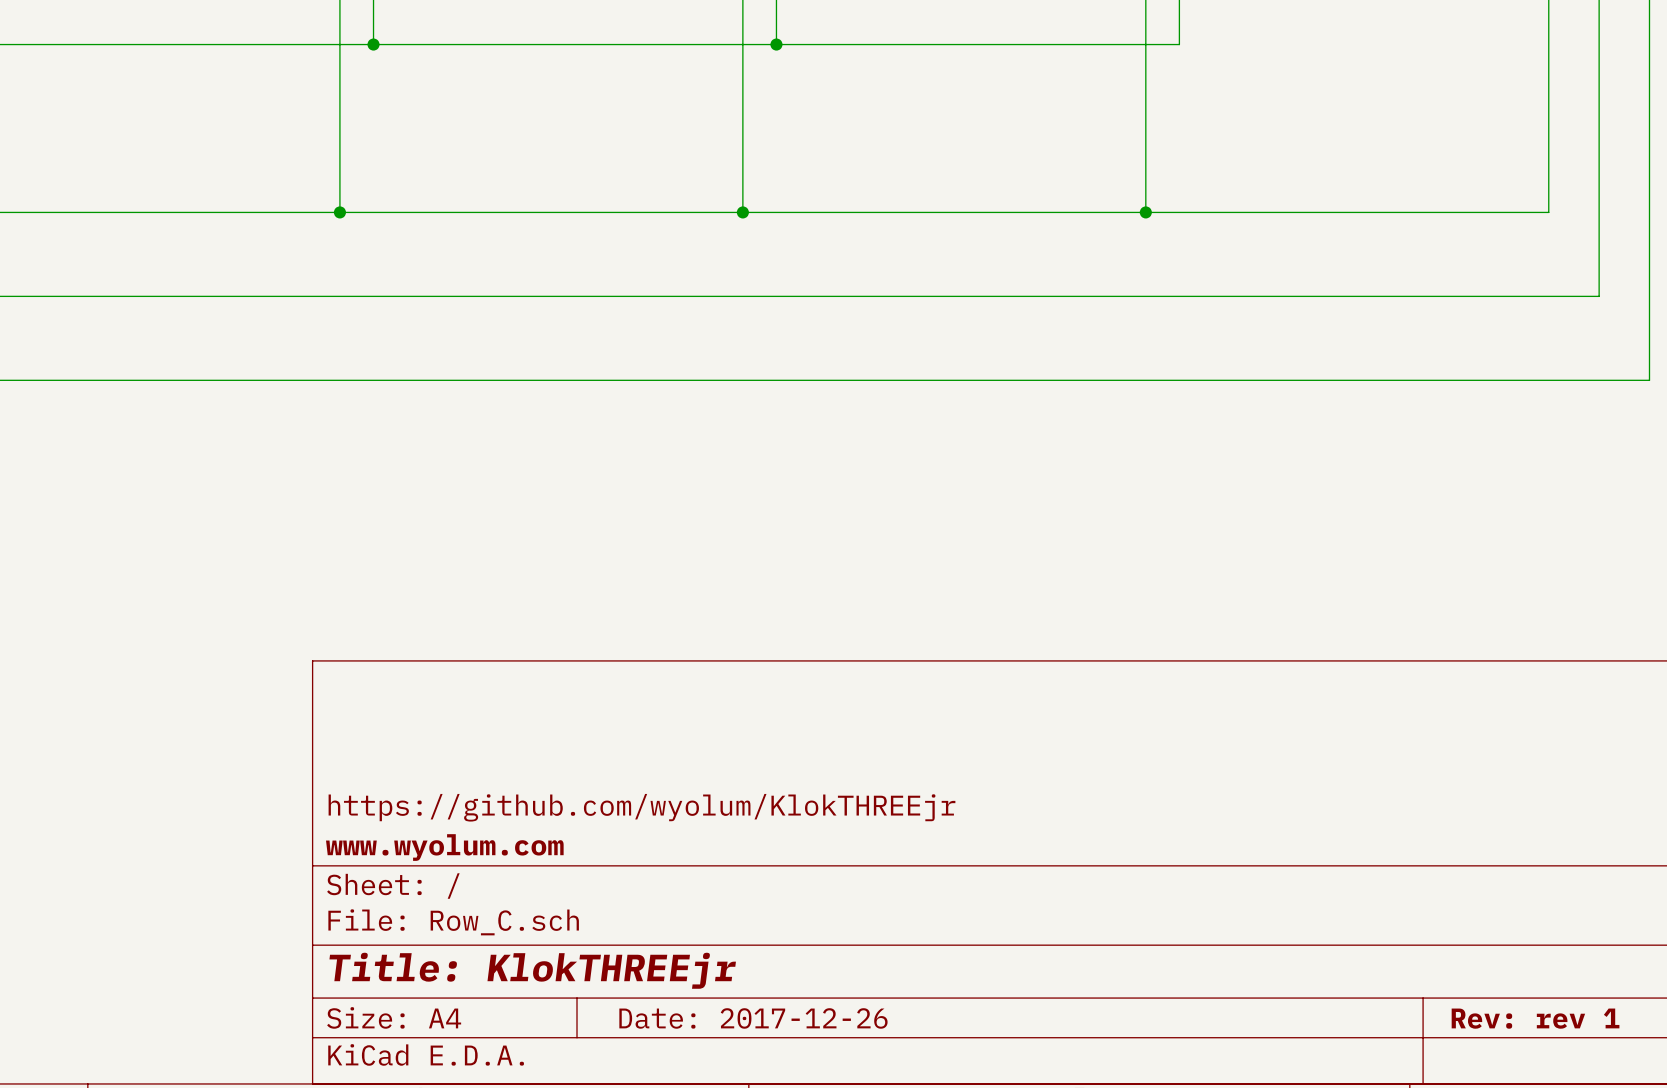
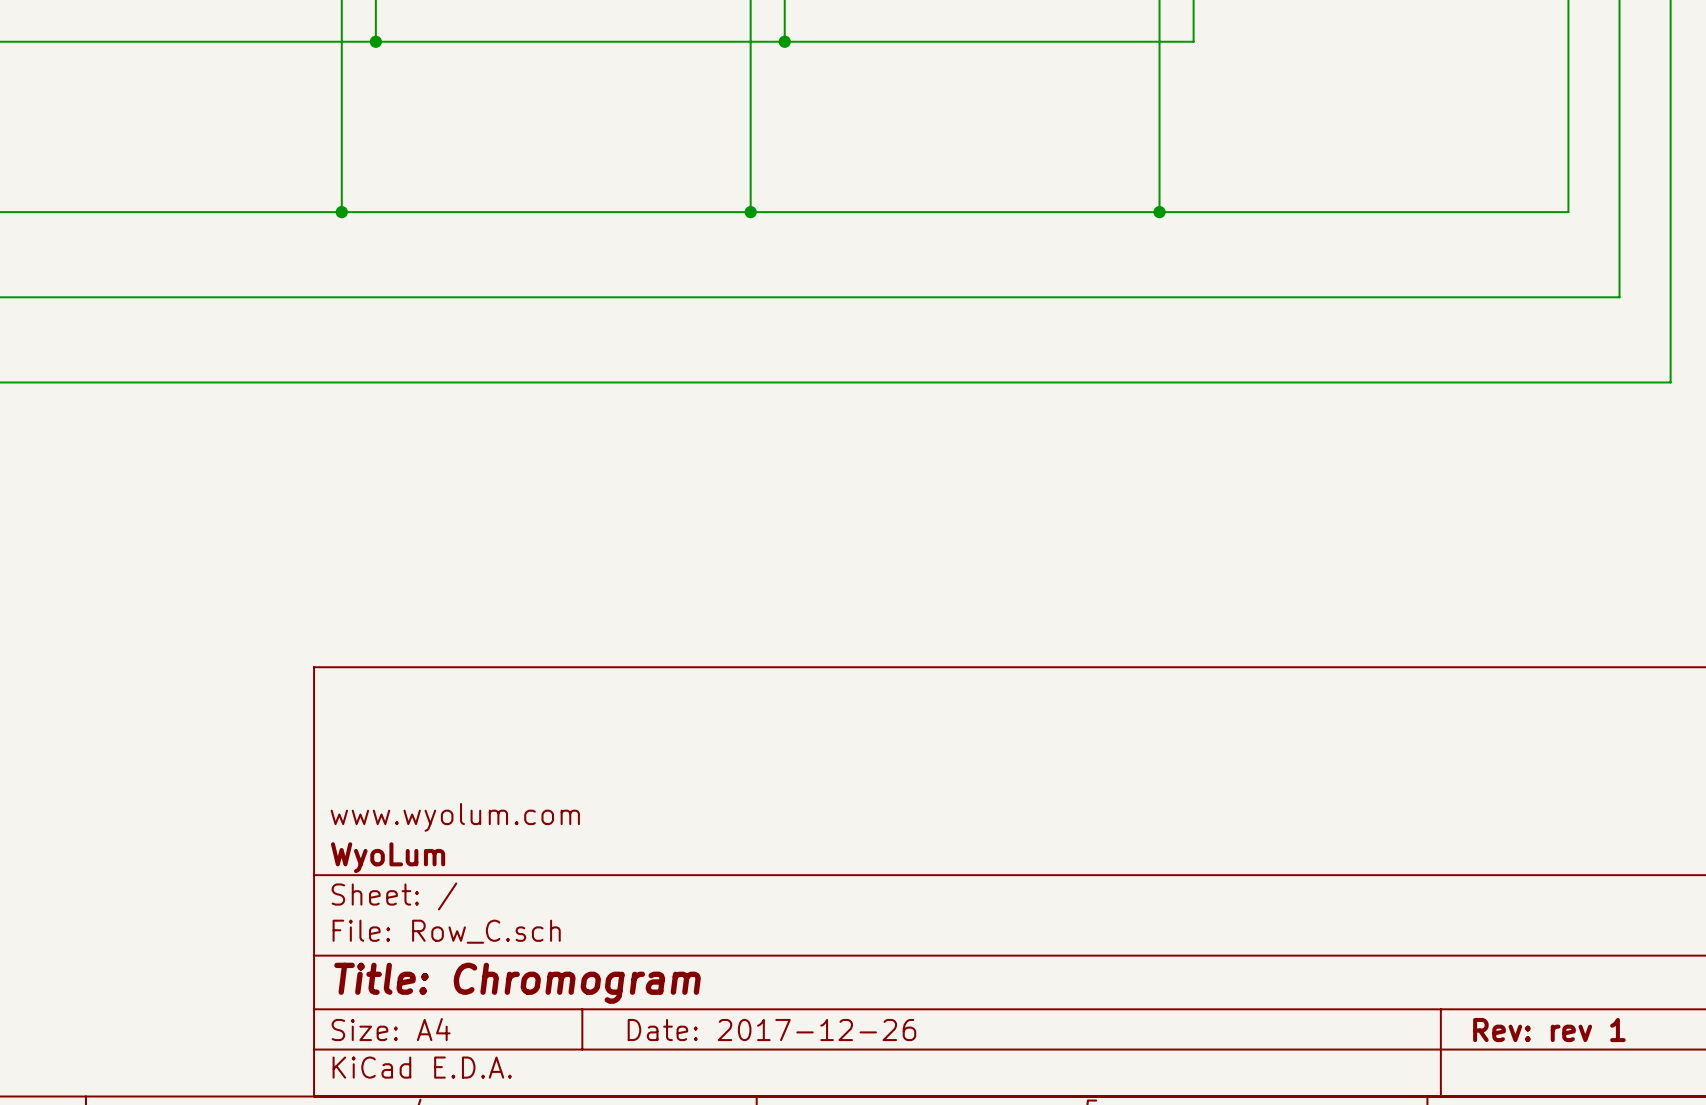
title block: https://github.com/wyolum/KlokTHREEjr (641, 807) -> www.wyolum.com (455, 817)
title block: www.wyolum.com (444, 847) -> WyoLum (388, 857)
title block: Title: KlokTHREEjr (532, 970) -> Title: Chromogram (517, 983)

